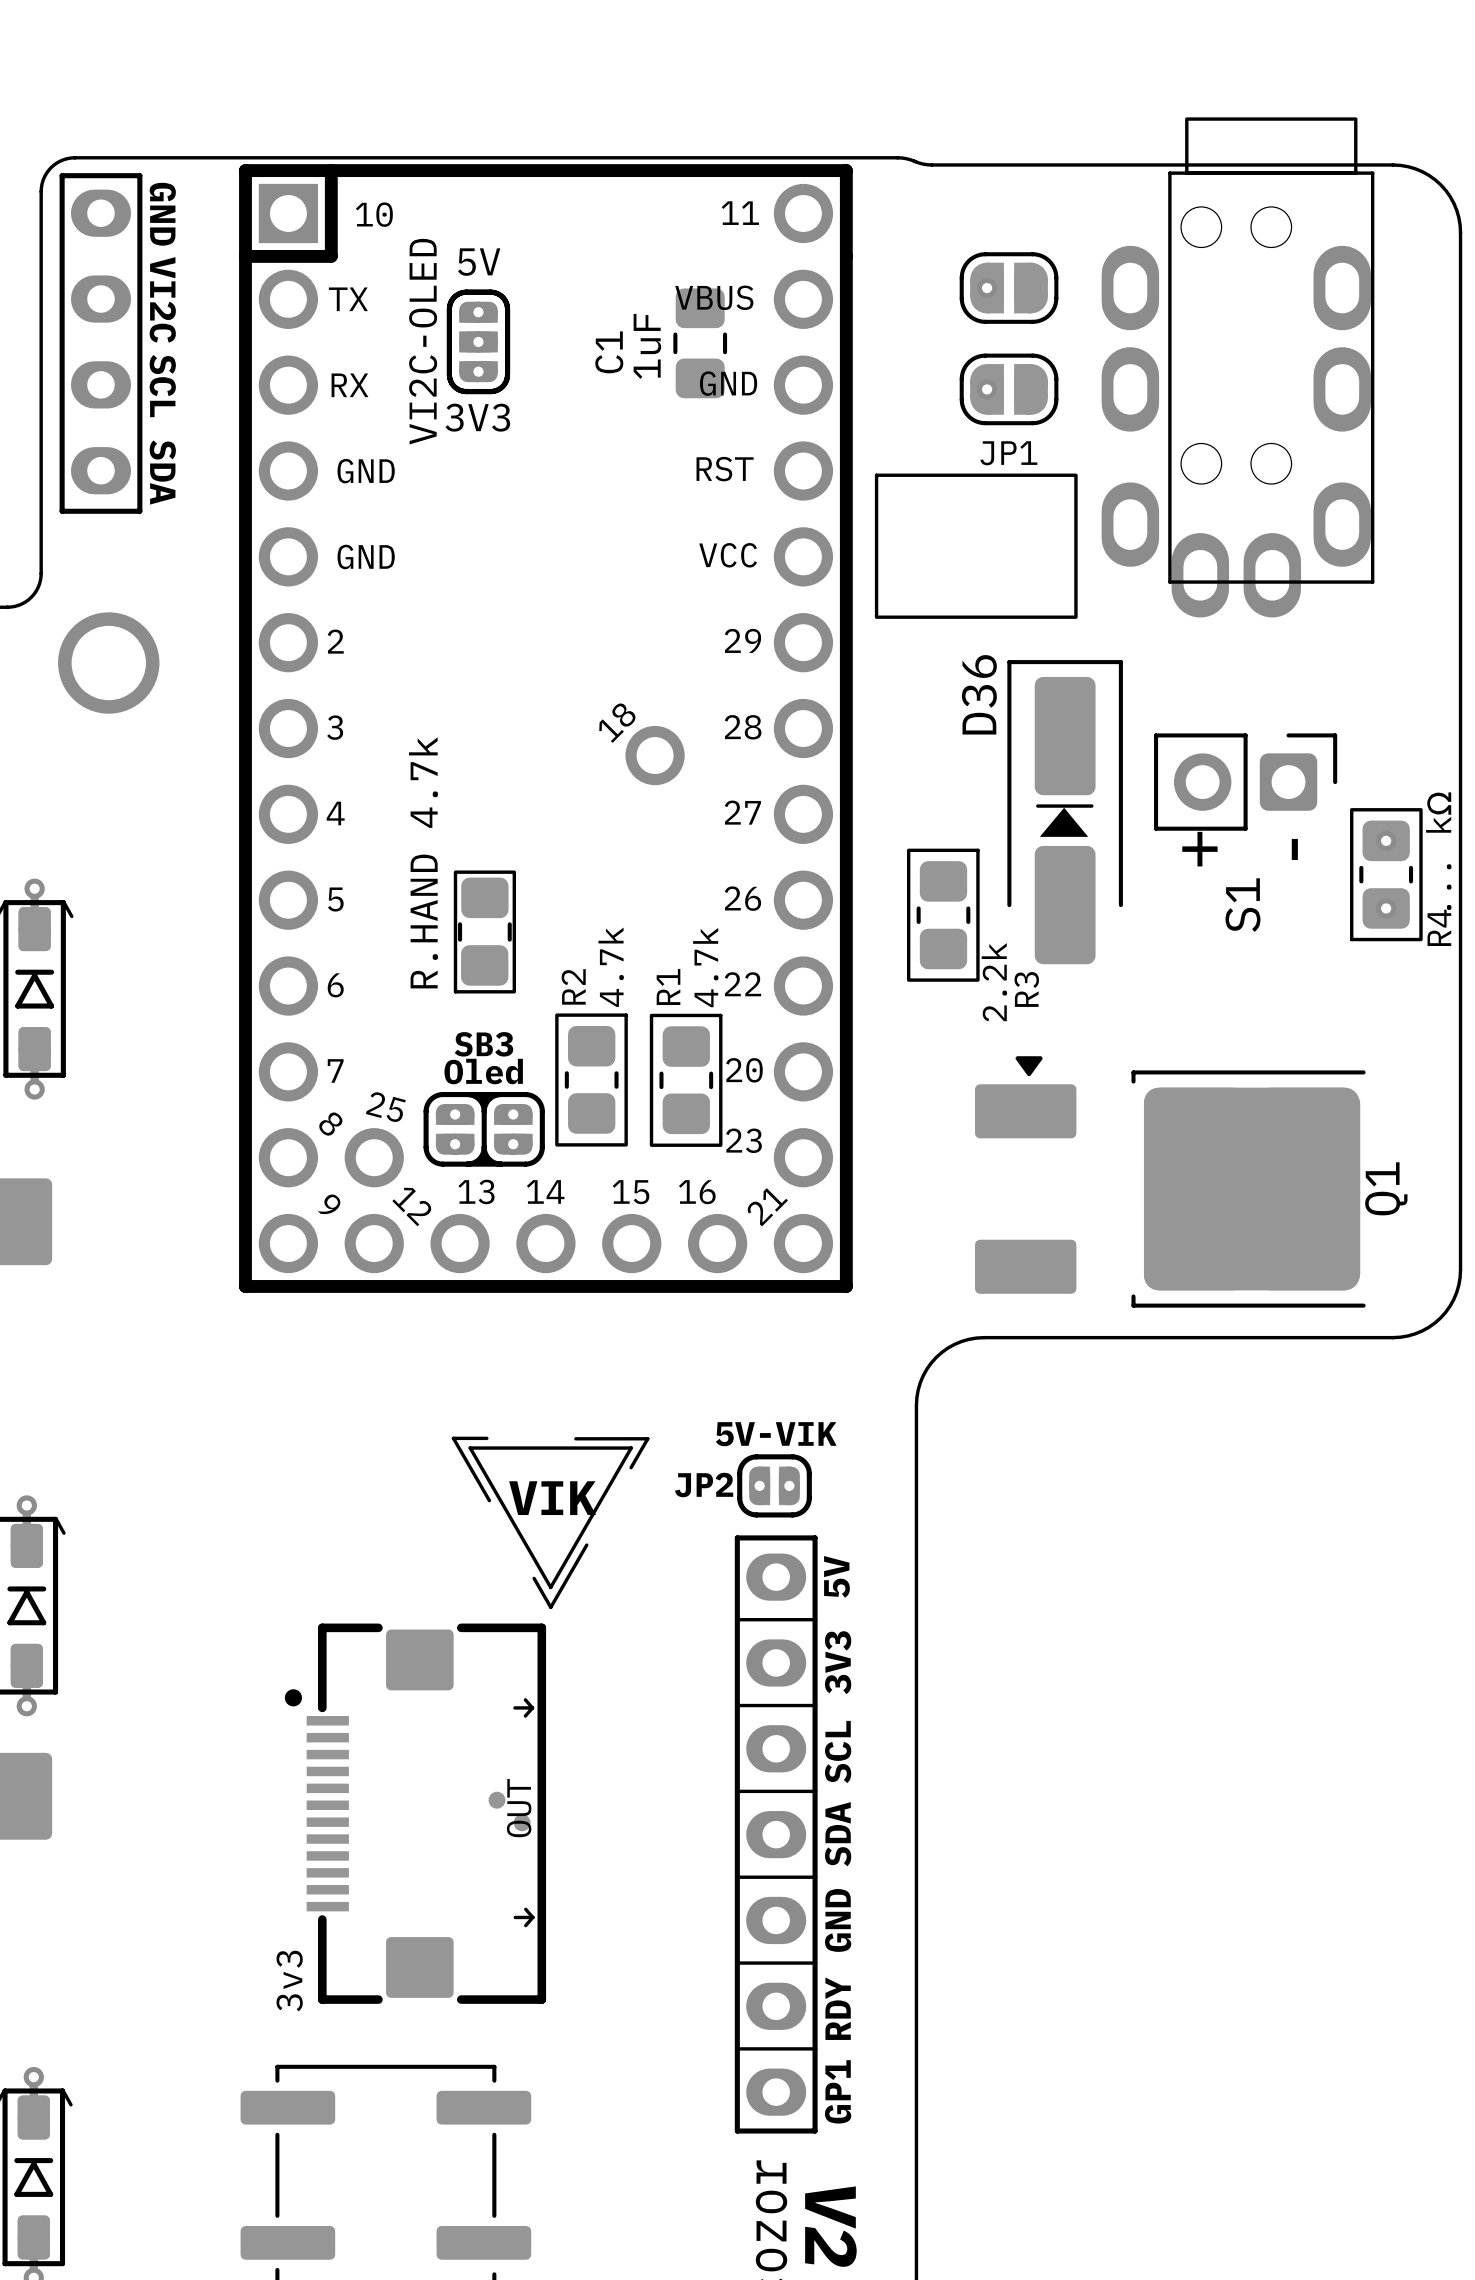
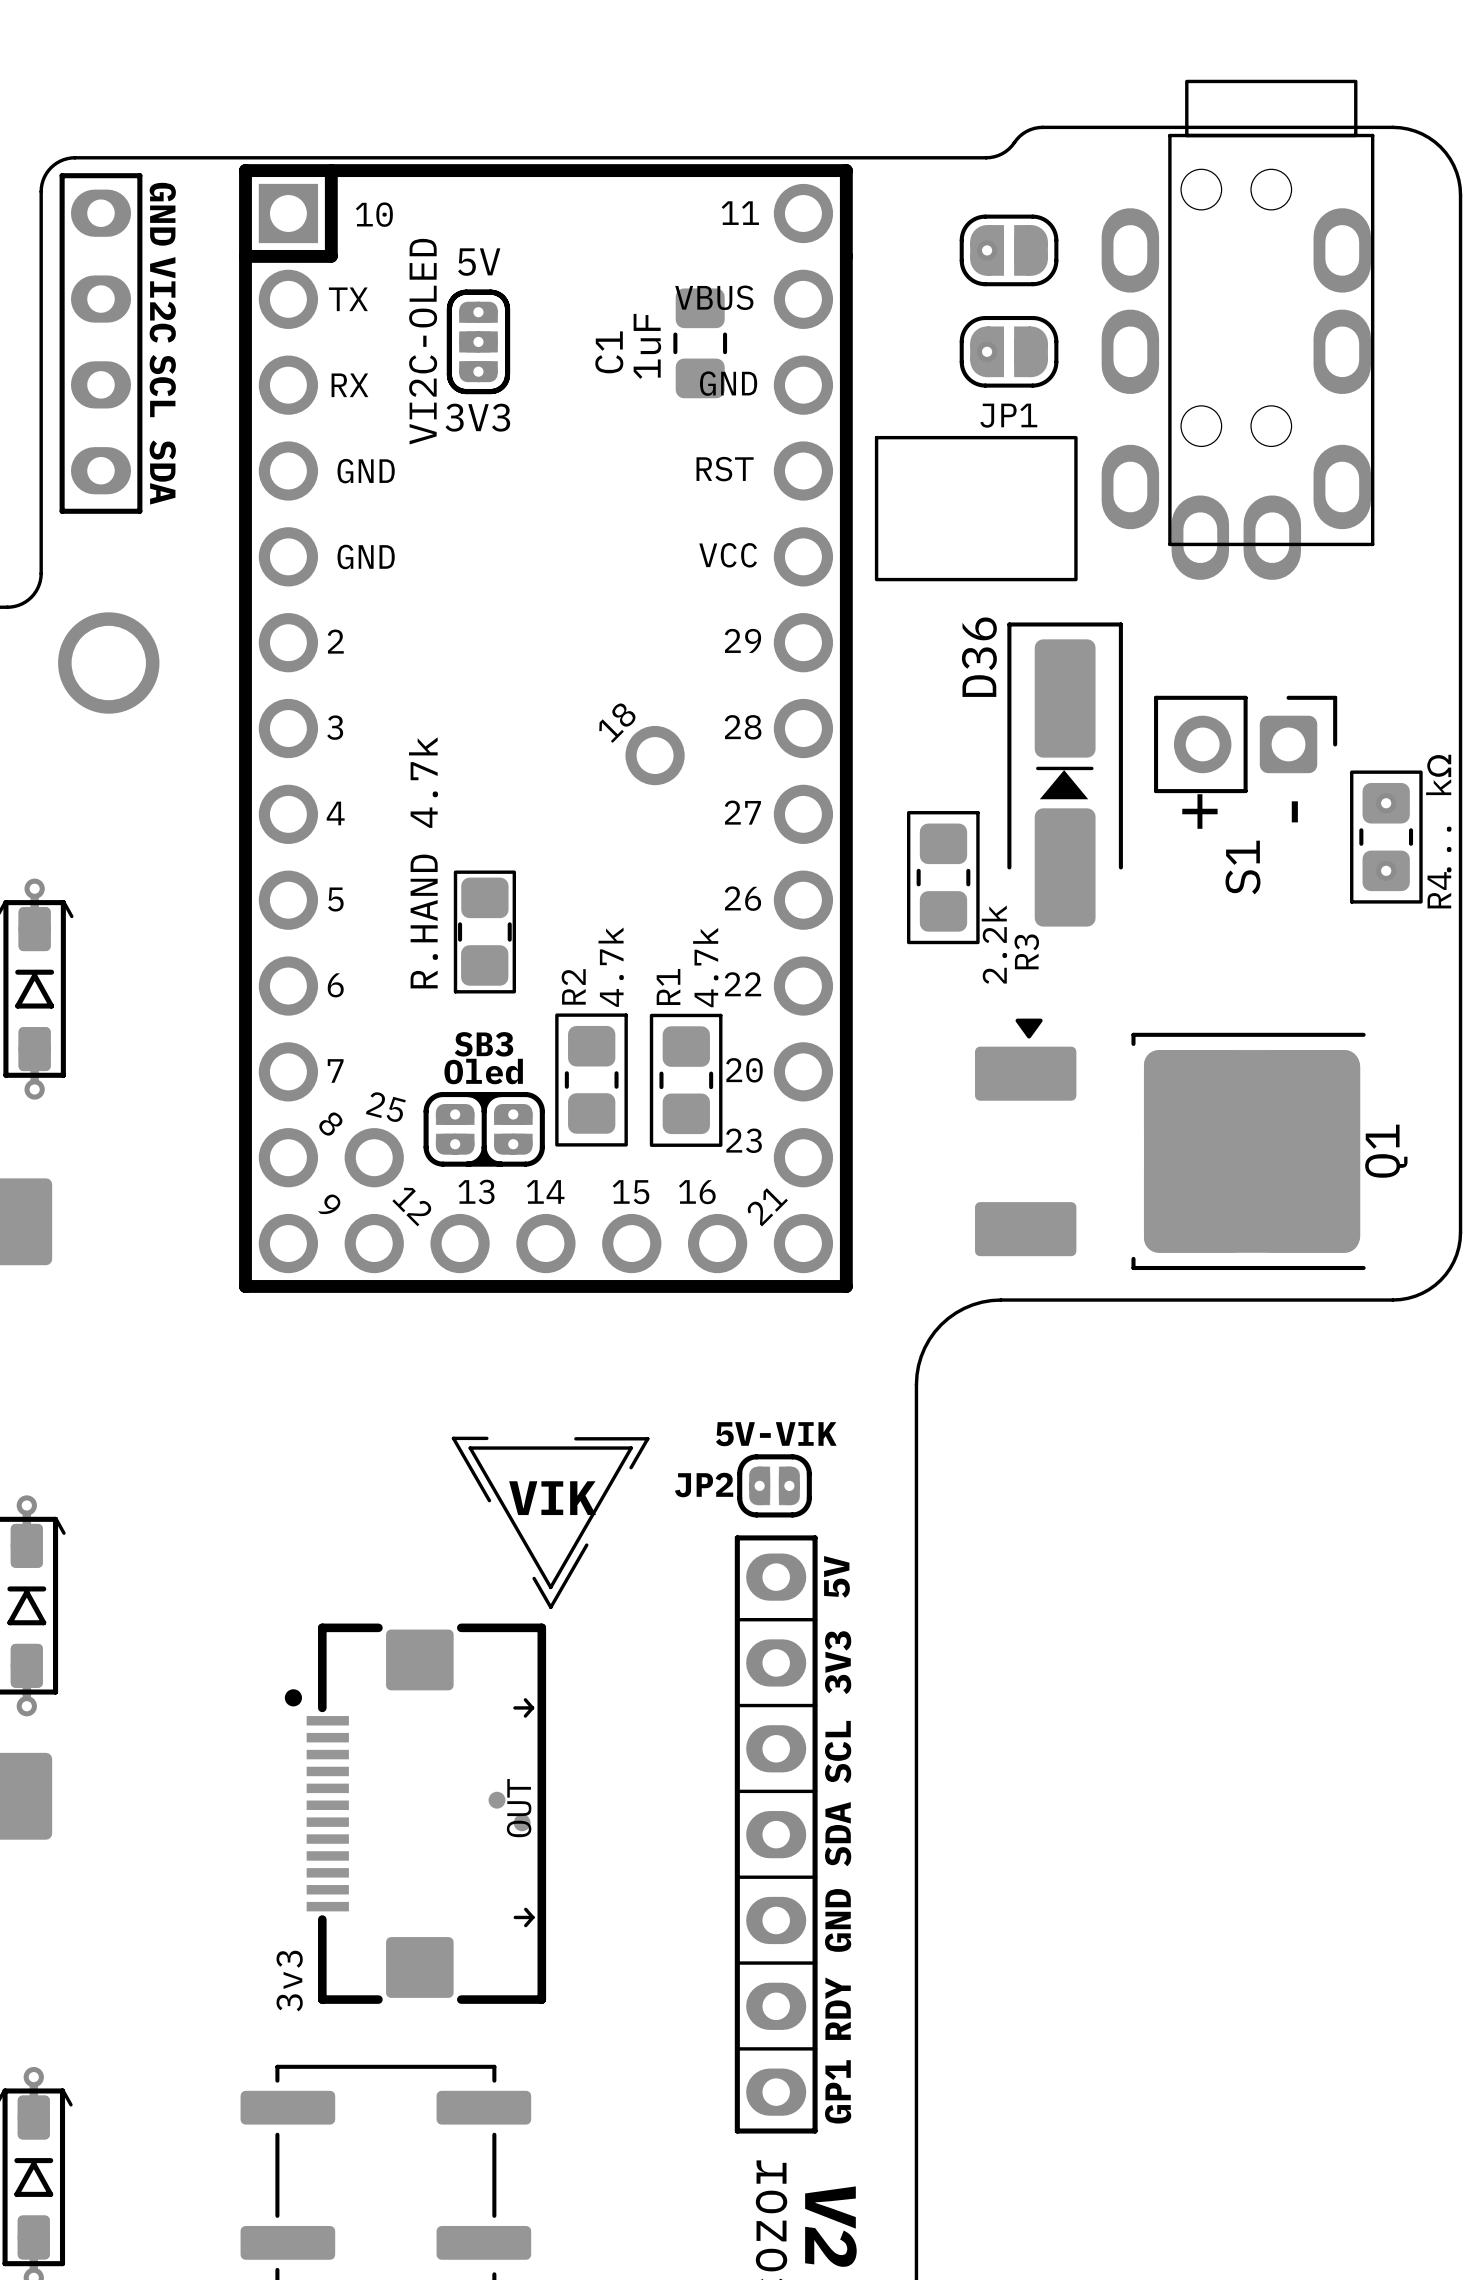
board edge: (897, 157) (931, 164) (1400, 165) (1422, 171) (1435, 179) (1445, 190) (1456, 210) (1460, 232) -> (897, 157) (994, 156) (1005, 151) (1026, 131) (1042, 127) (1400, 127) (1415, 131) (1428, 137) (1440, 147) (1450, 159) (1456, 172) (1460, 187) (1460, 232)
part position: (1238, 367) -> (1238, 329)
JP1 position: (976, 435) -> (976, 397)
S1 position: (1245, 782) -> (1245, 744)
D36 position: (1065, 812) -> (1065, 774)
R4 position: (1386, 874) -> (1386, 837)
R3 position: (943, 915) -> (943, 877)
Q1 position: (1170, 1181) -> (1170, 1144)
board edge: (1460, 1232) (1460, 1277) (1453, 1299) (1445, 1312) (1435, 1322) (1415, 1333) (1392, 1337) (976, 1338) (961, 1341) (948, 1348) (931, 1363) (920, 1382) (916, 1405) -> (1460, 1232) (1458, 1247) (1453, 1261) (1440, 1280) (1422, 1293) (1400, 1299) (1000, 1300) (973, 1304) (948, 1318) (929, 1339) (918, 1365) (916, 1405)

